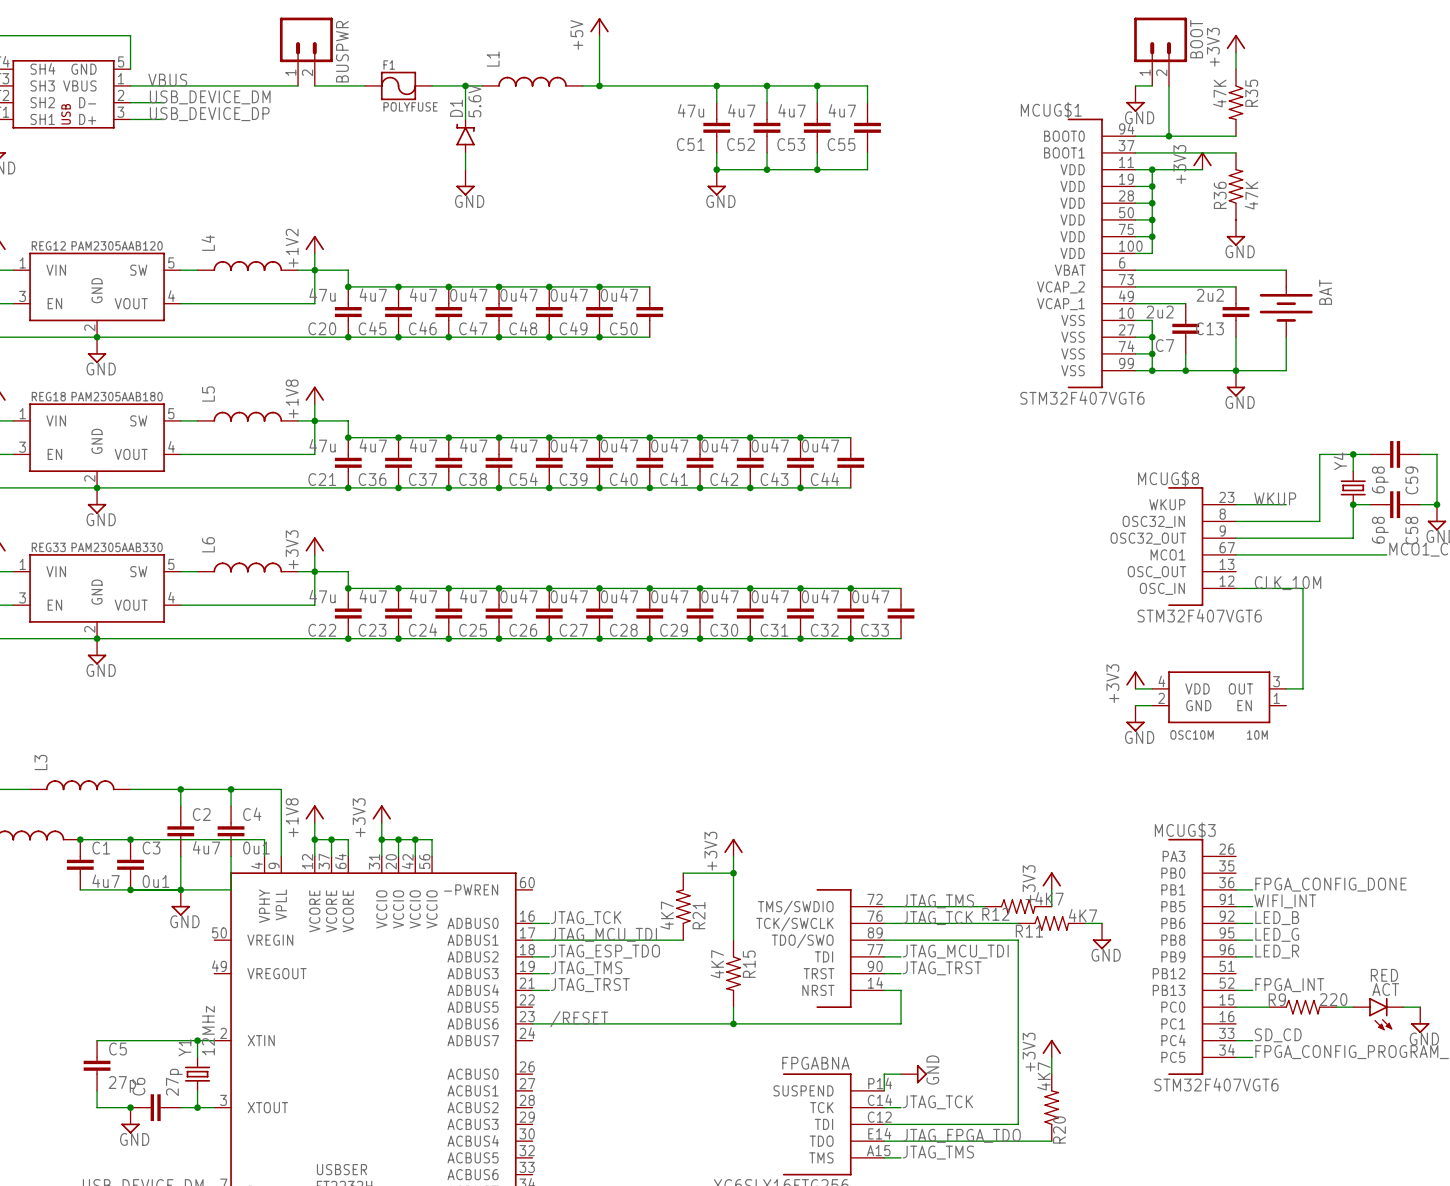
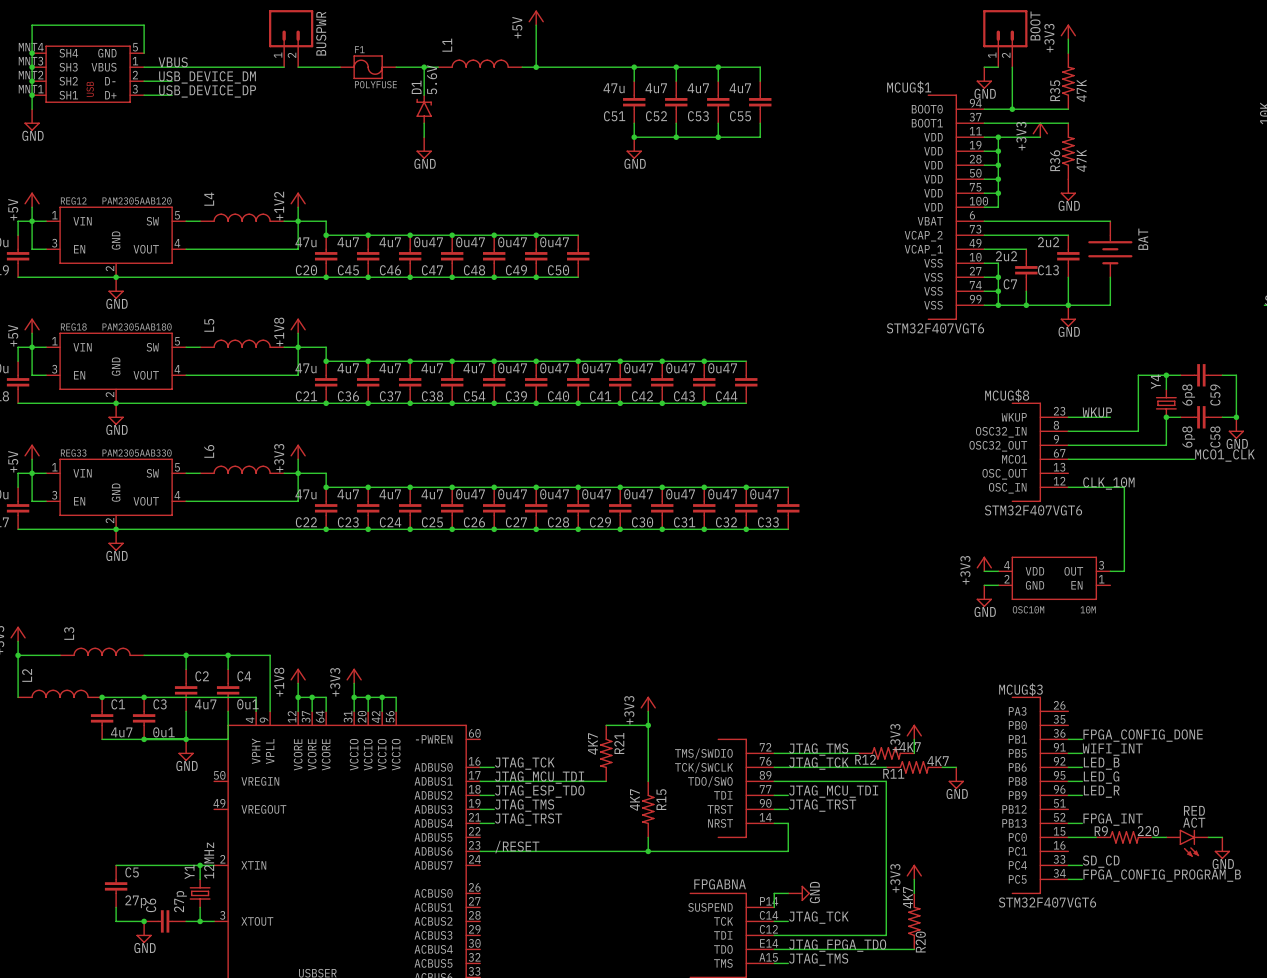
R35 rotation: 0° (1235, 102) -> 180° (1068, 81)
R21 flip: as is (683, 906) -> up-down (606, 753)

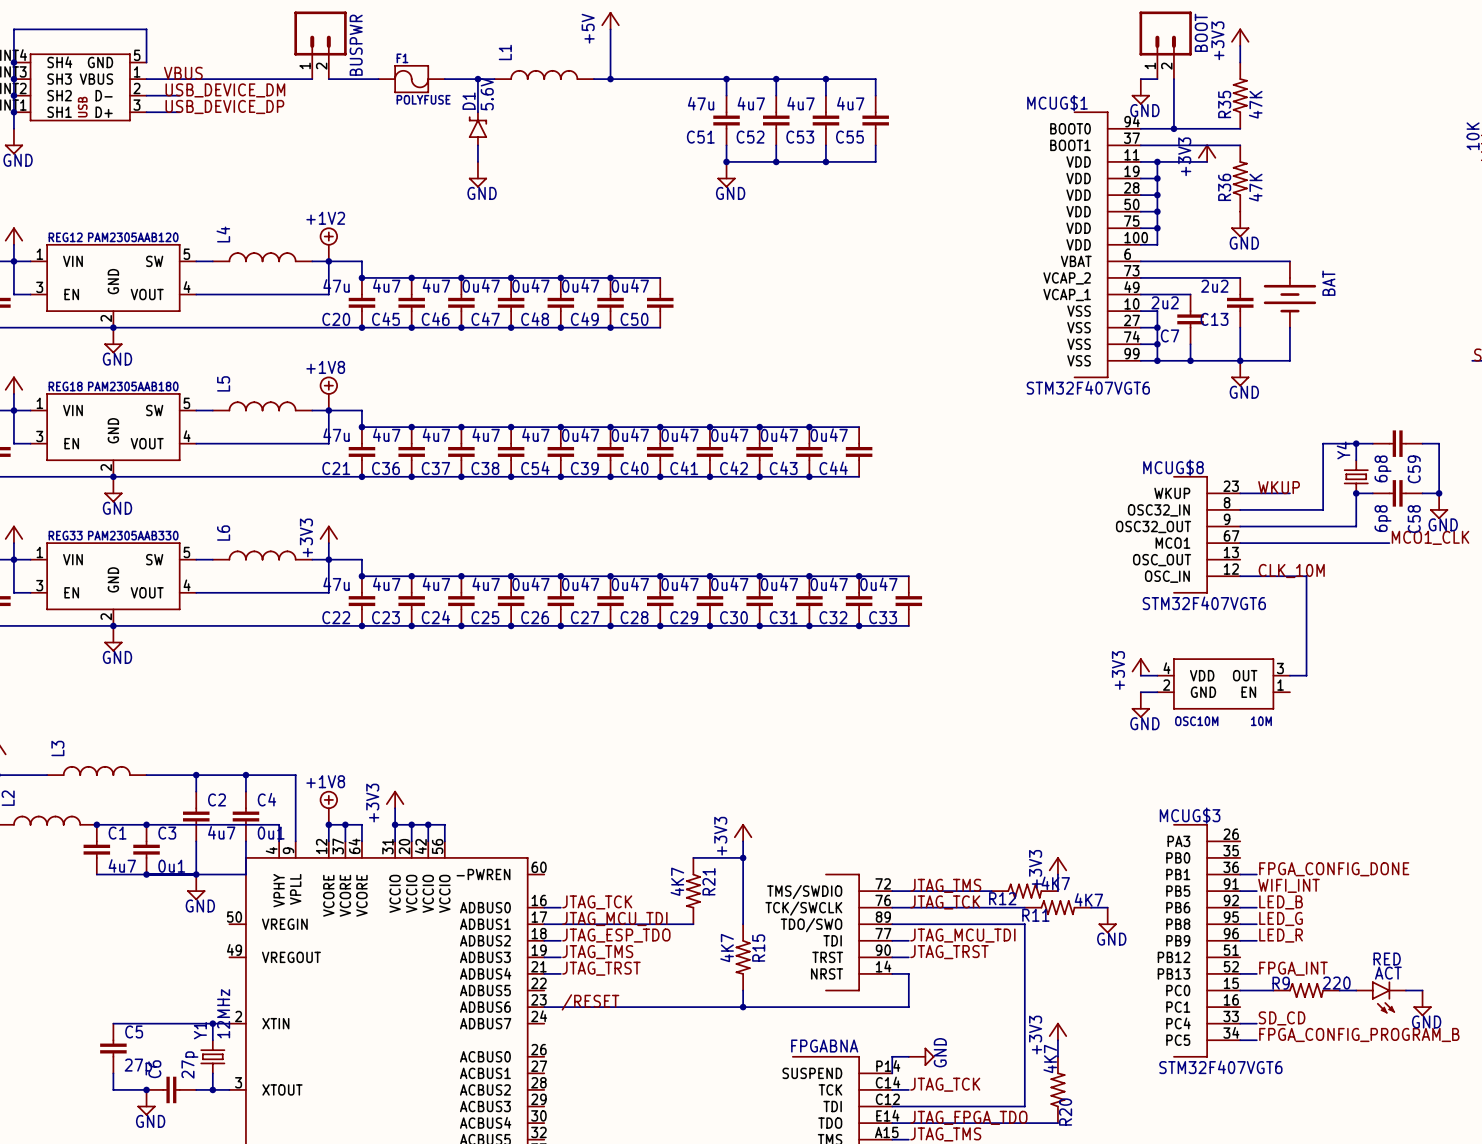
power symbol: +1V2 (298, 199) -> none
power symbol: none -> +1V2 (328, 244)
power symbol: +1V8 (298, 325) -> none
power symbol: none -> +1V8 (328, 393)
power symbol: +1V8 (298, 676) -> none
power symbol: none -> +1V8 (328, 807)

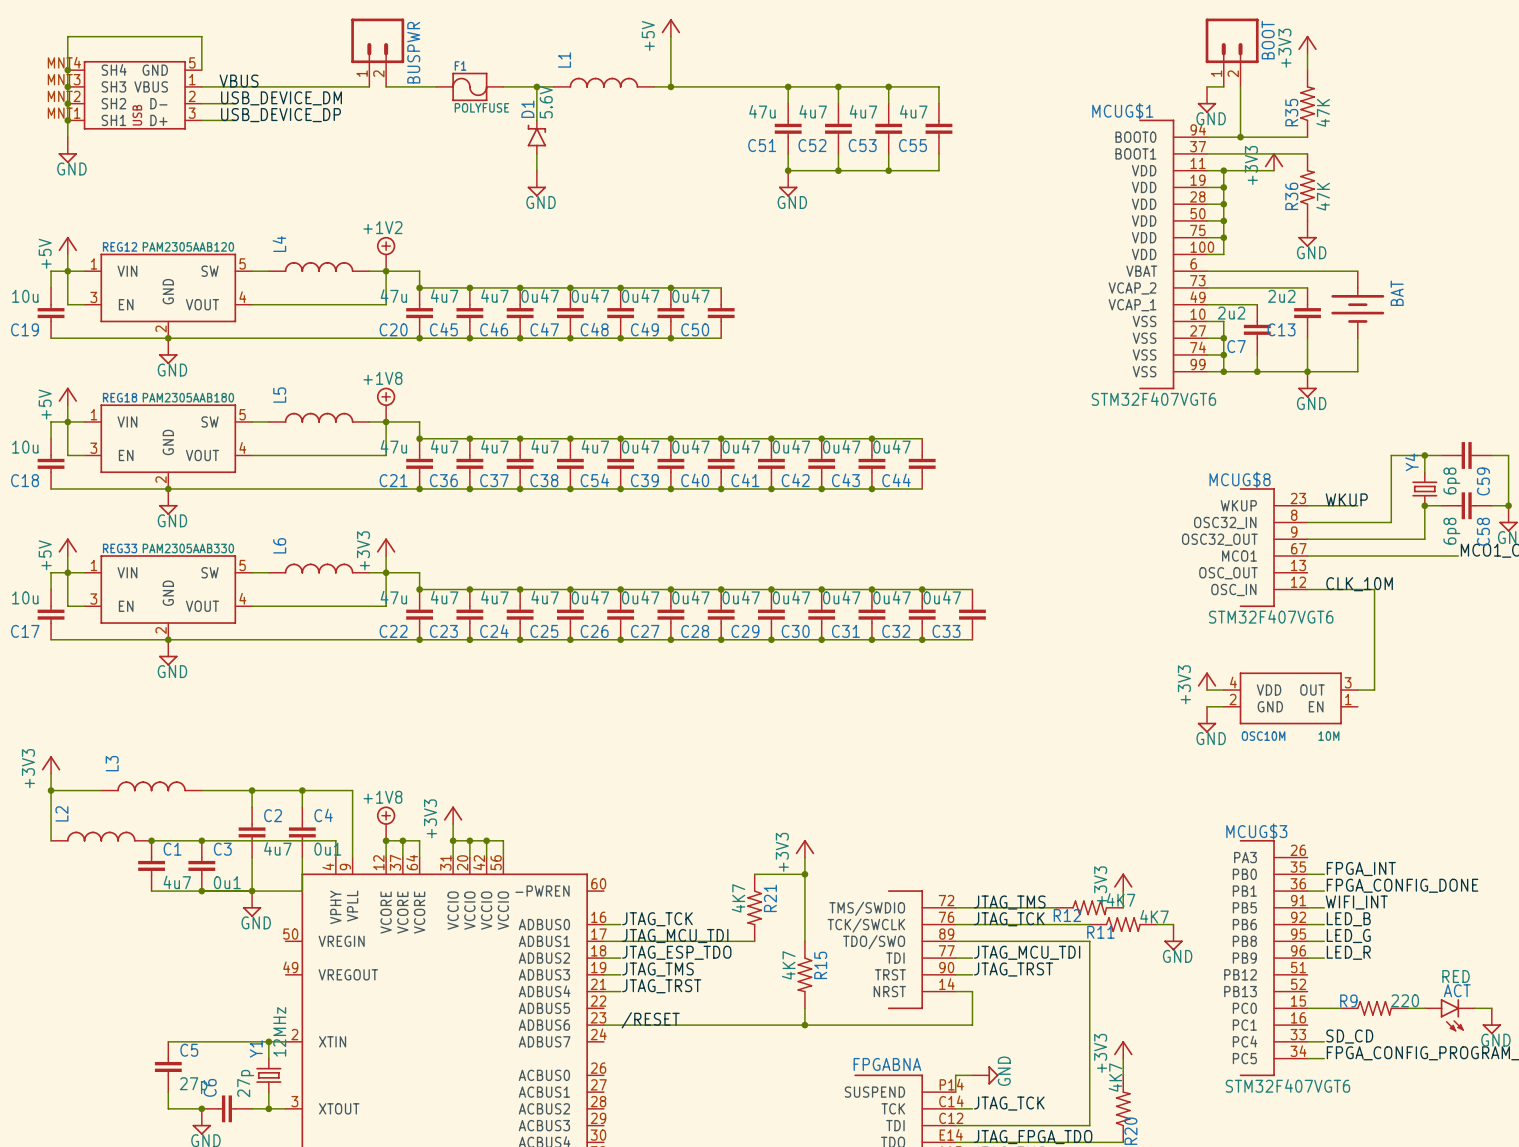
label position: FPGA_INT (1293, 968) -> FPGA_INT (1361, 869)
wire: (1240, 973) (1256, 973) -> (1307, 874) (1324, 874)

